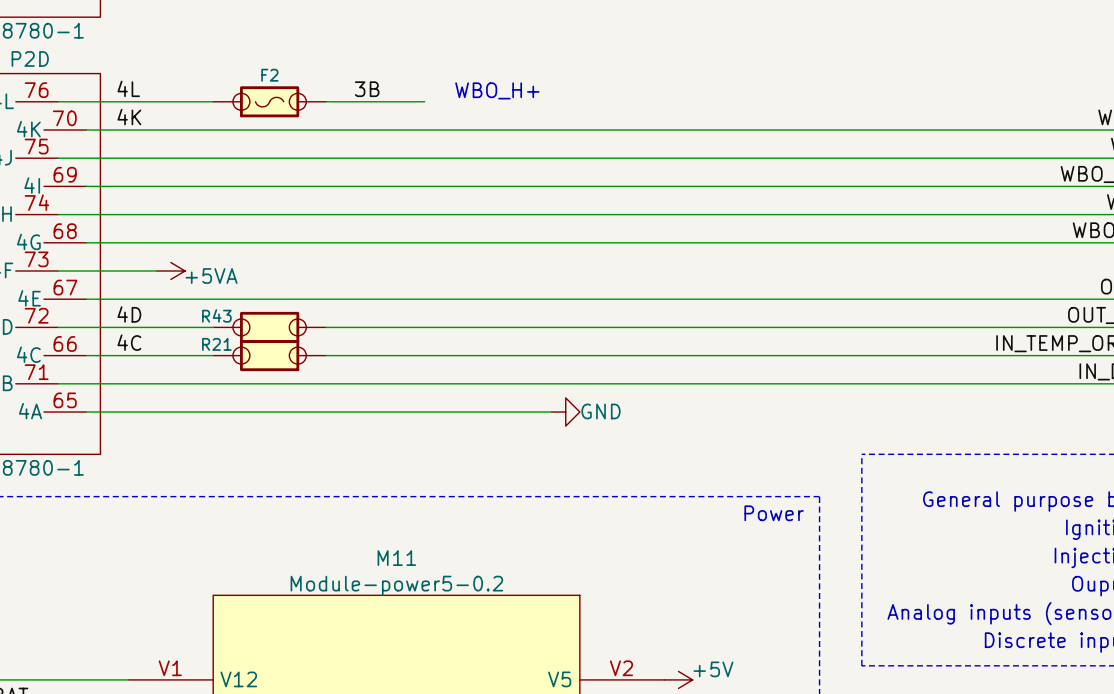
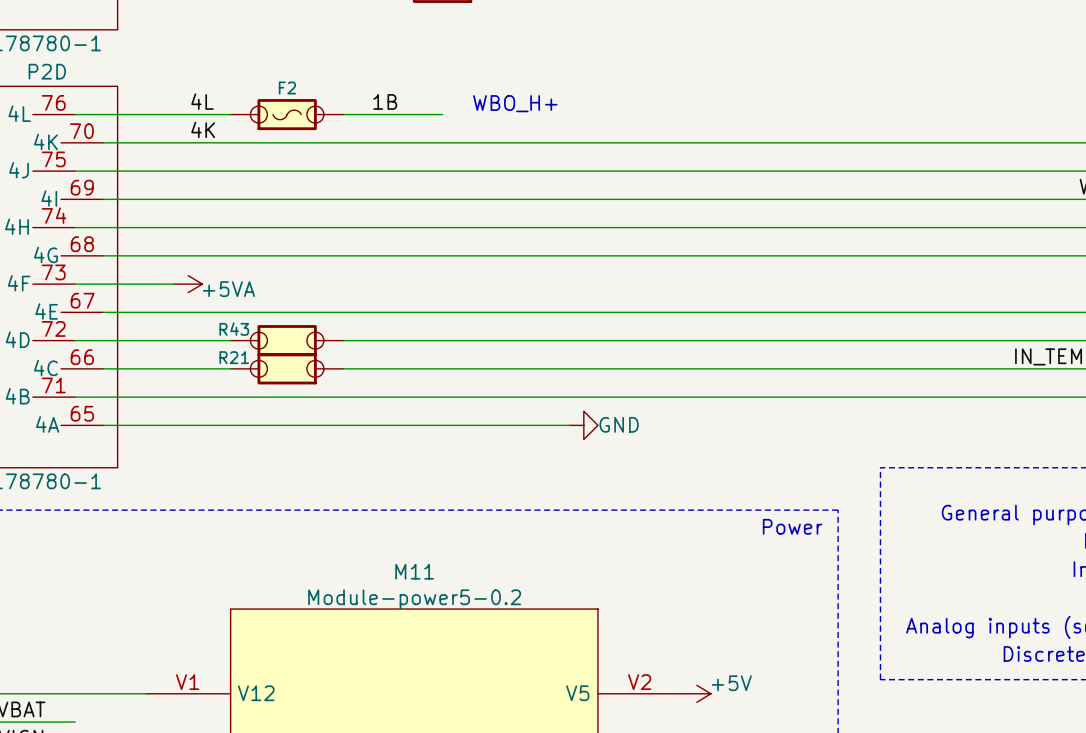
label position: 4L (128, 88) -> 4L (202, 101)
label: 3B (367, 89) -> 1B (385, 101)
label position: 4K (129, 117) -> 4K (203, 129)
label: 4D (129, 314) -> none
label: 4C (129, 342) -> none

